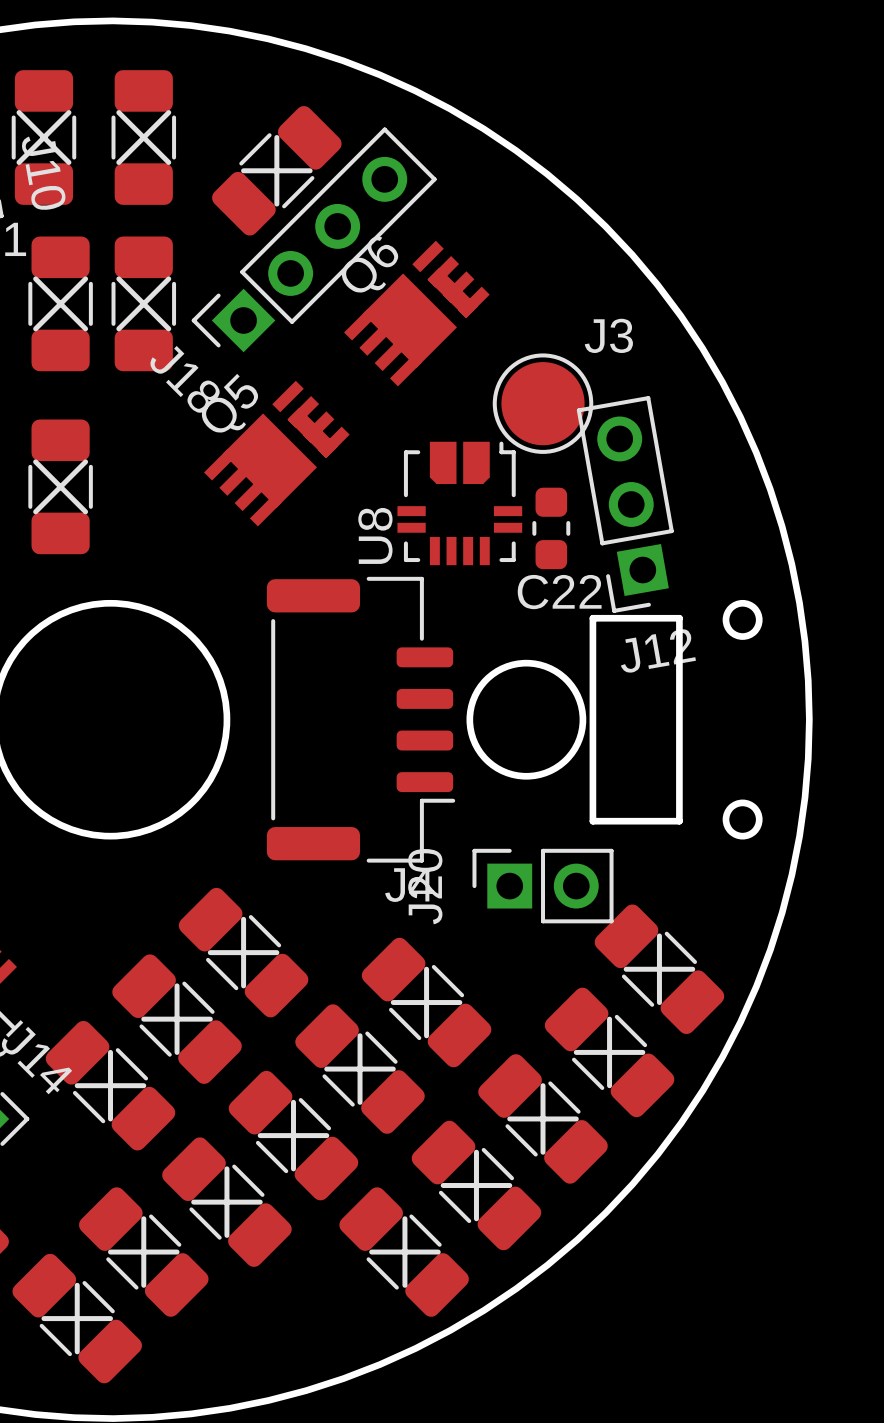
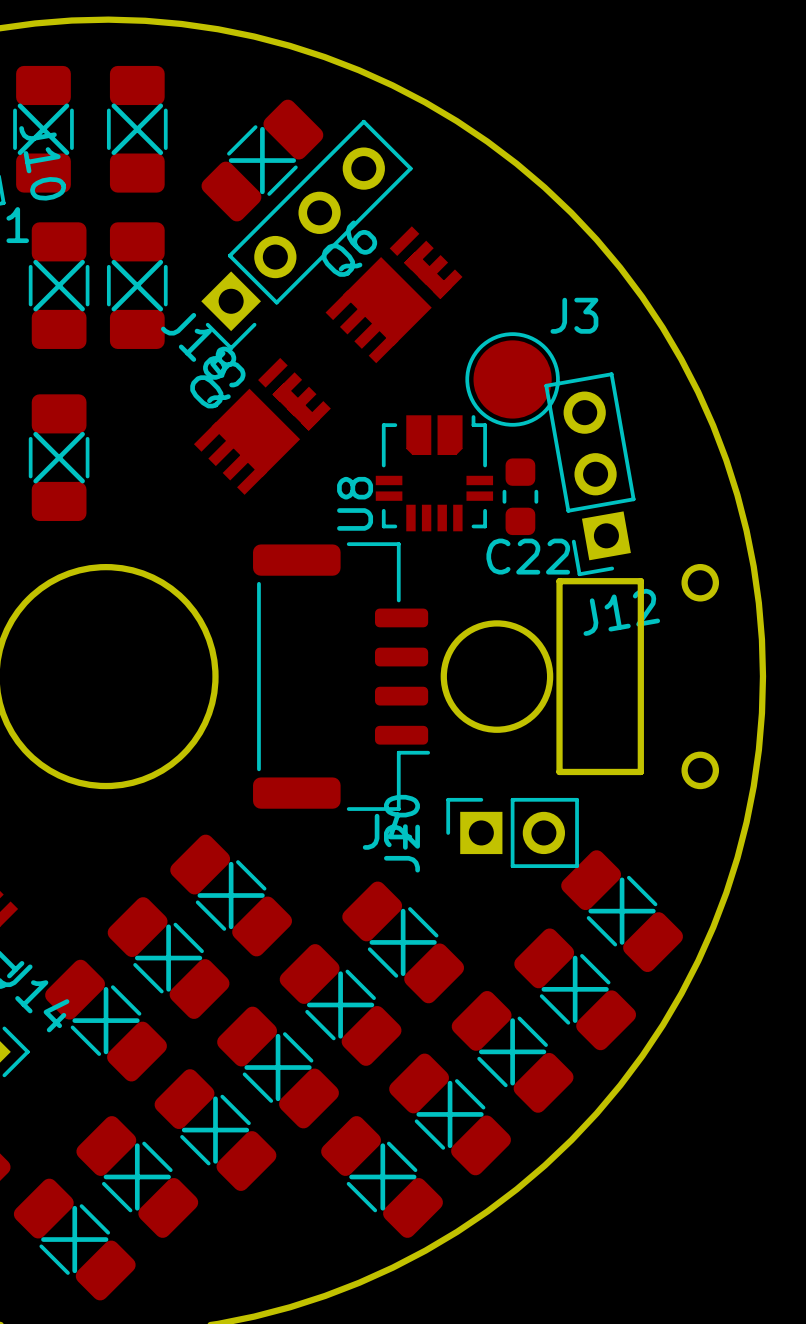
J18 footprint: [191, 127, 437, 353] -> [201, 119, 413, 351]

